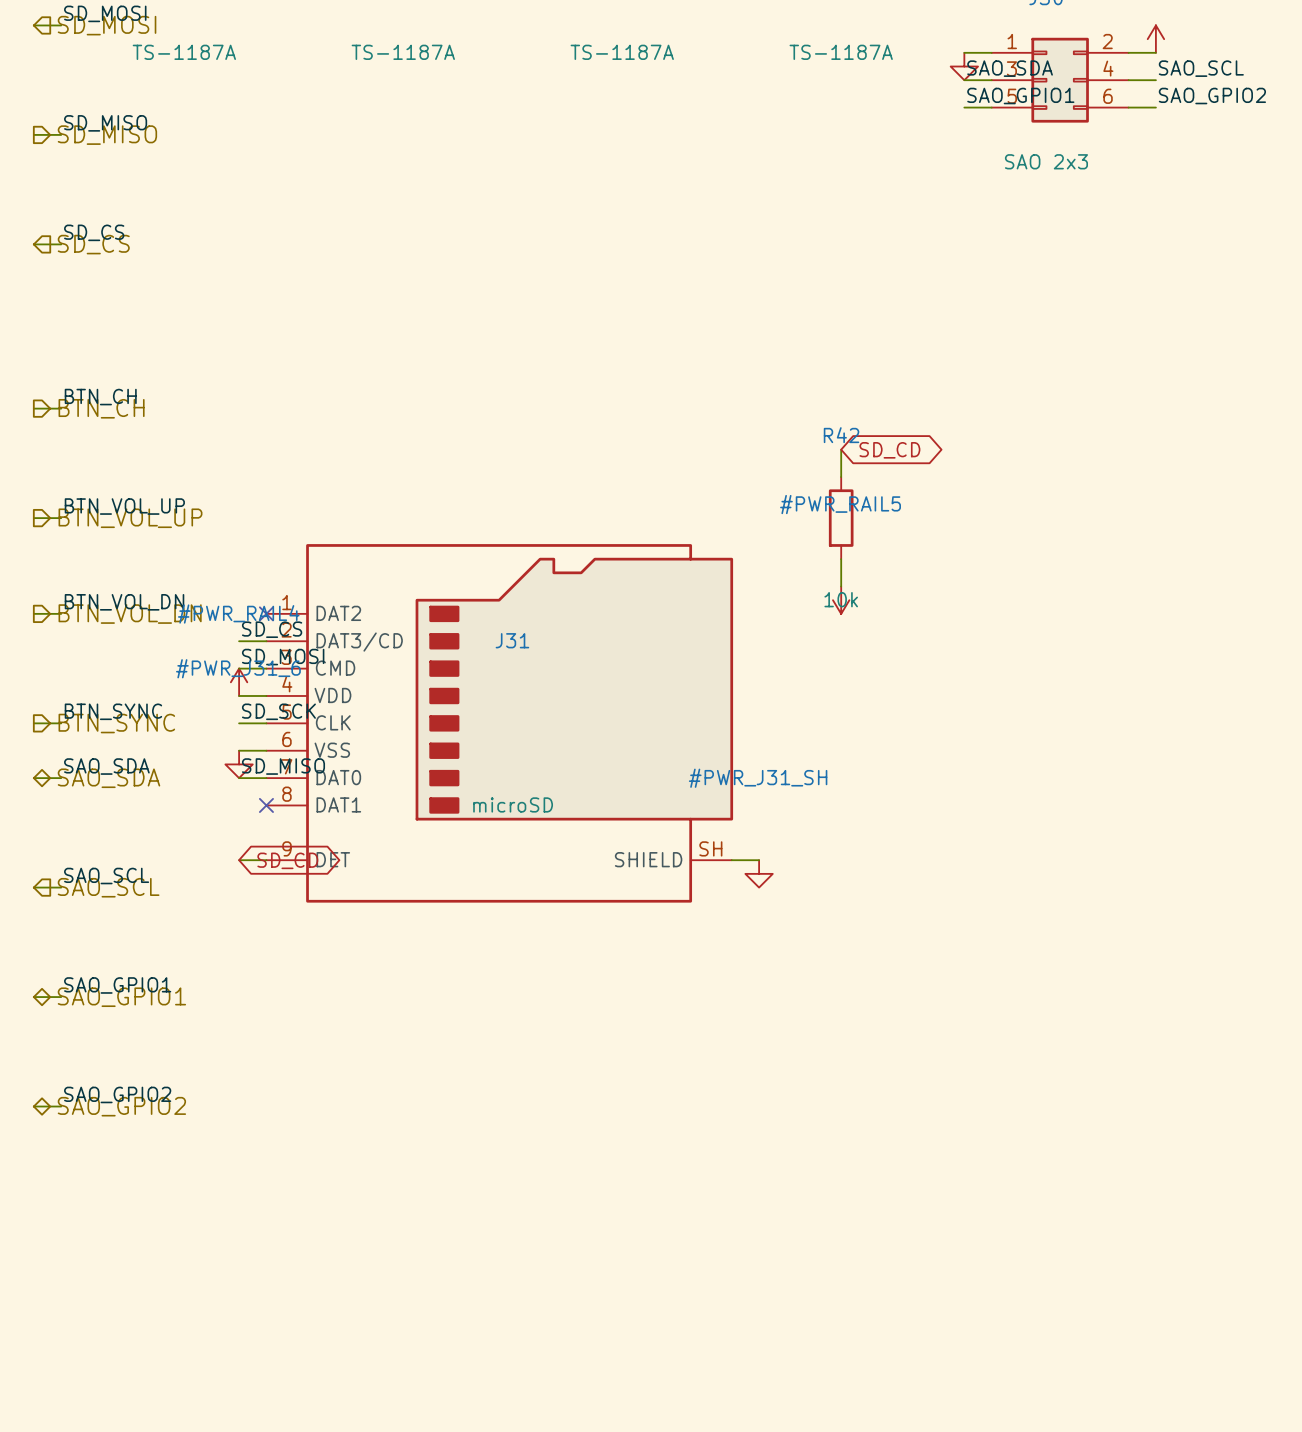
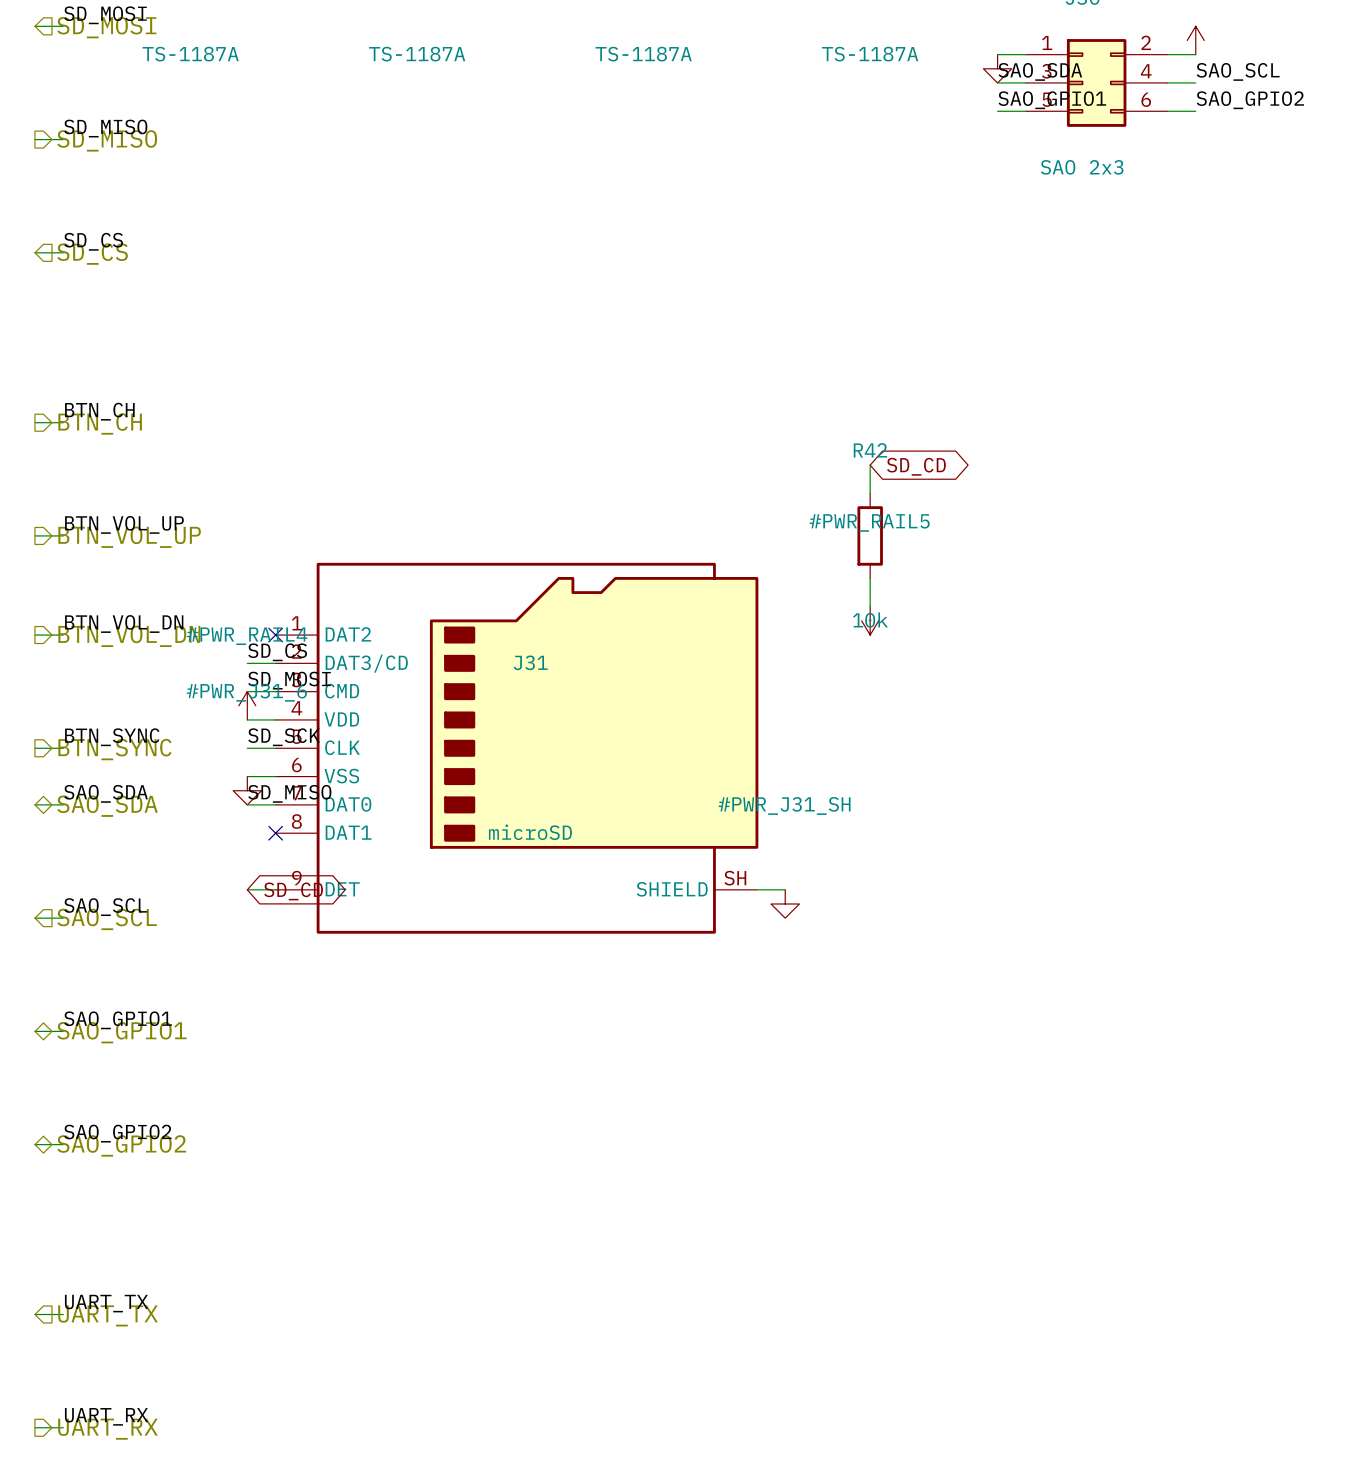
label: none -> UART_TX (106, 1303)
wire: none -> (34, 1314) (63, 1314)
hierarchical label: none -> UART_TX (108, 1315)
label: none -> UART_RX (106, 1416)
wire: none -> (34, 1427) (63, 1427)
hierarchical label: none -> UART_RX (108, 1429)

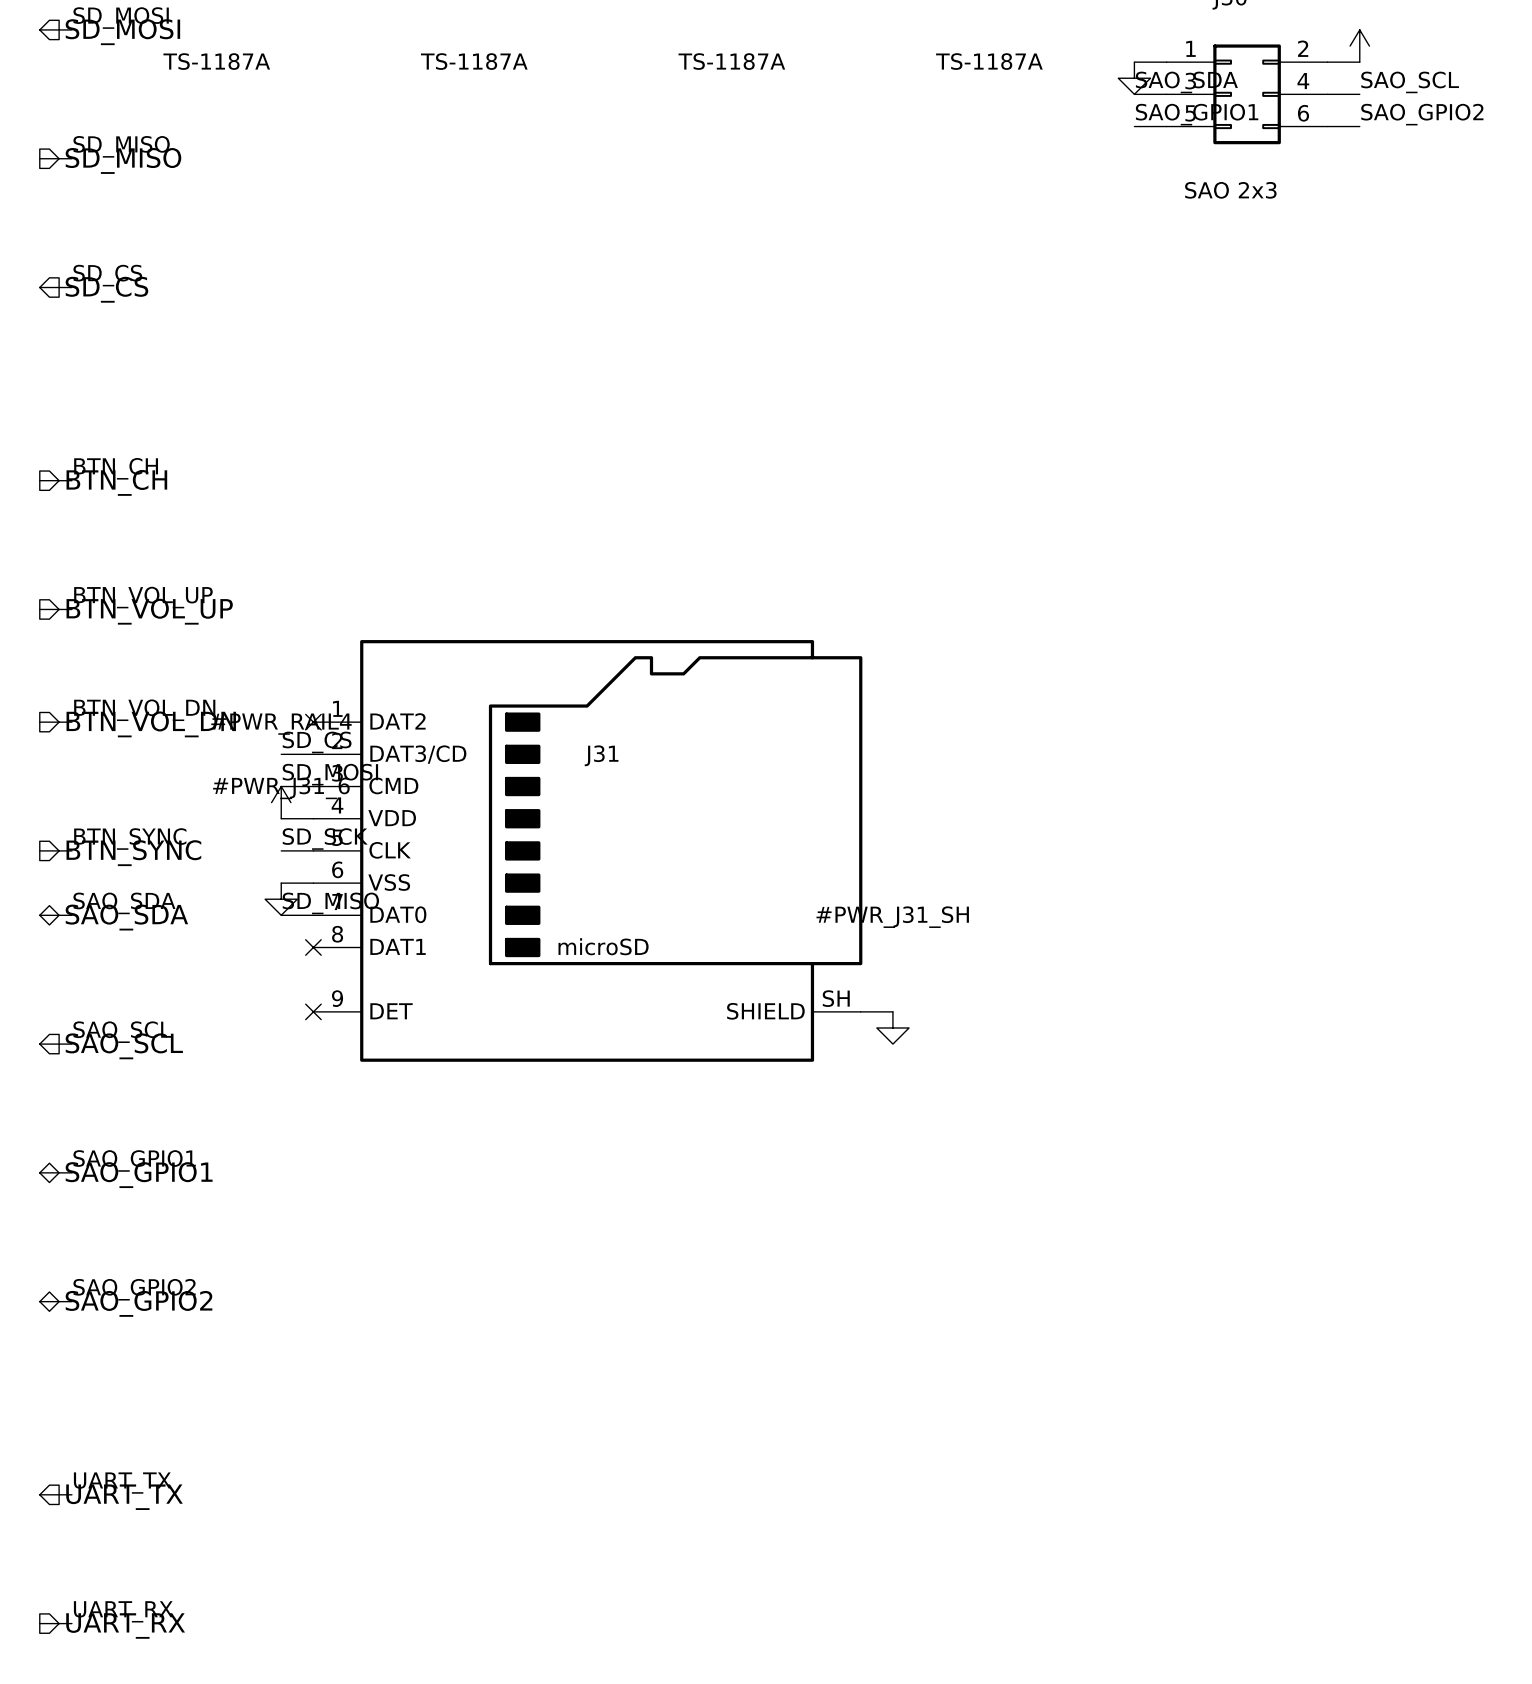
wire: (870, 465) (870, 493) -> none
global label: SD_CD (916, 466) -> none
R42: 10k (870, 535) -> none
wire: (870, 578) (870, 606) -> none
#PWR_RAIL5: (870, 620) -> none
wire: (247, 889) (275, 889) -> none
no-connect mark: none -> (313, 1011)
global label: SD_CD (293, 891) -> none

